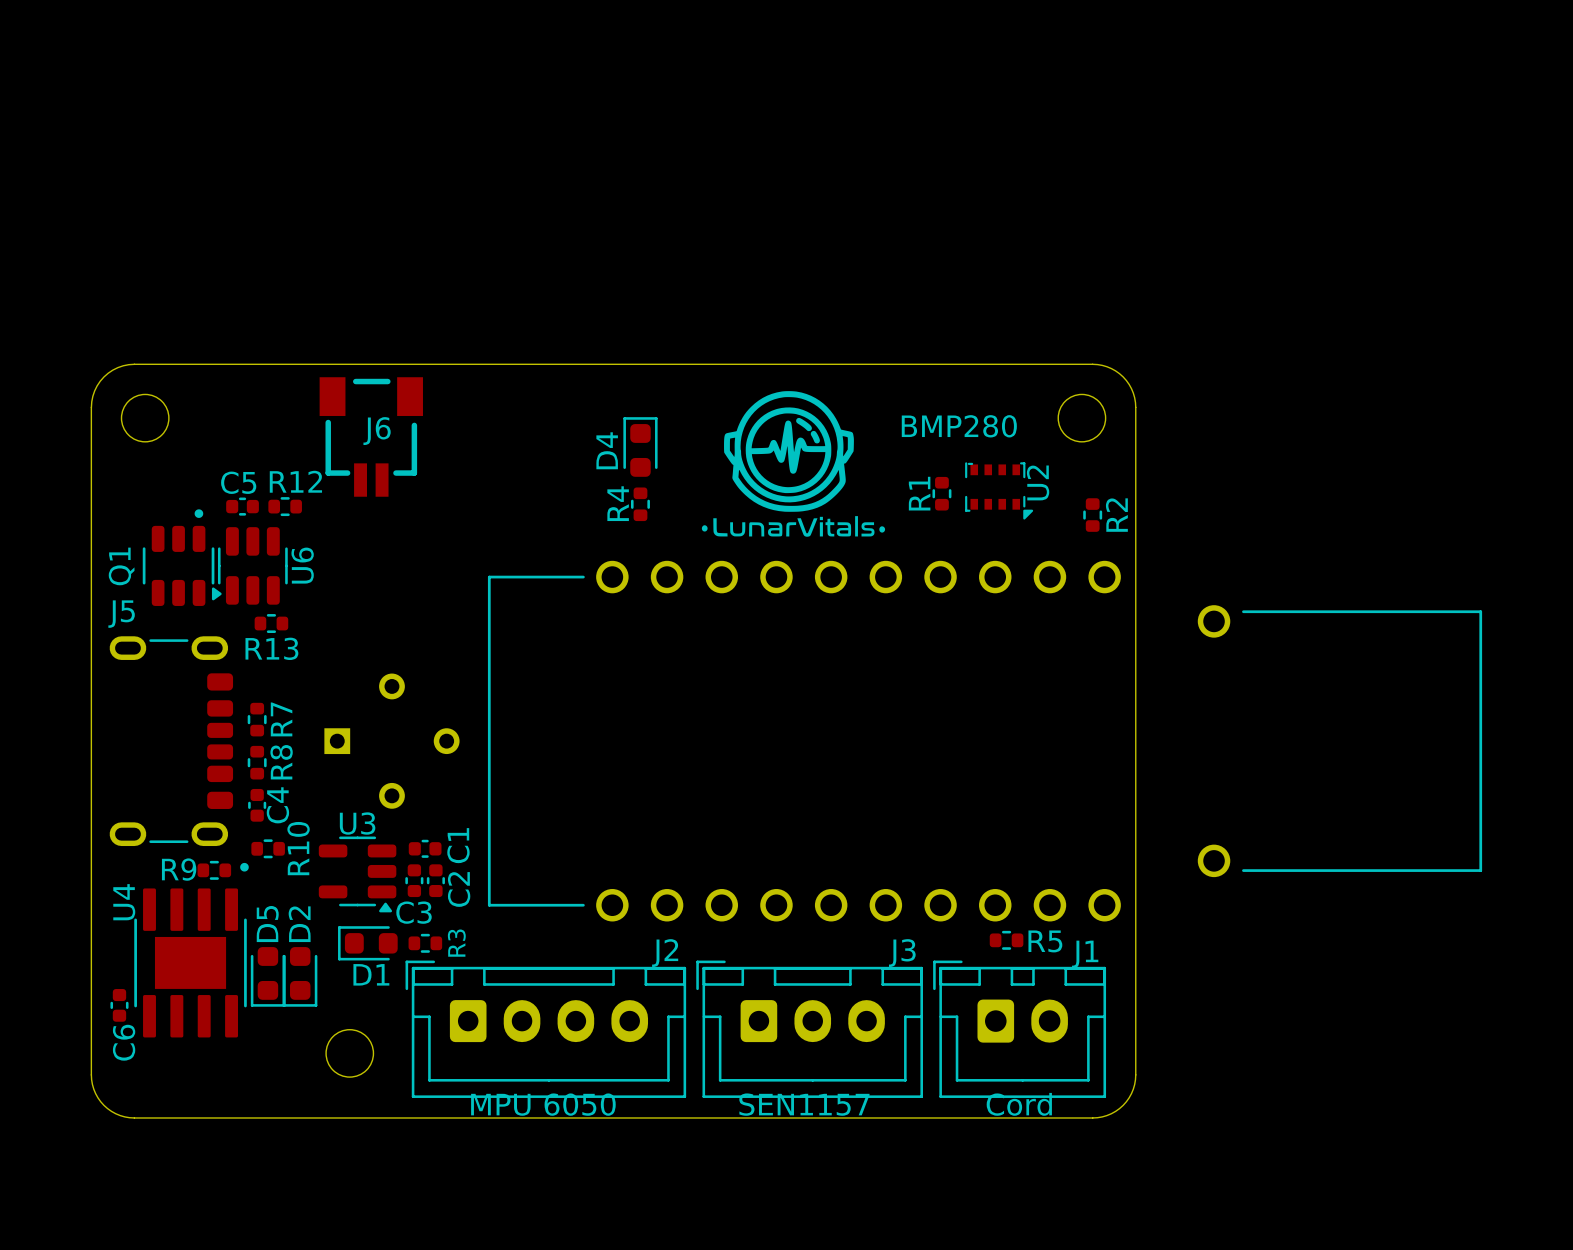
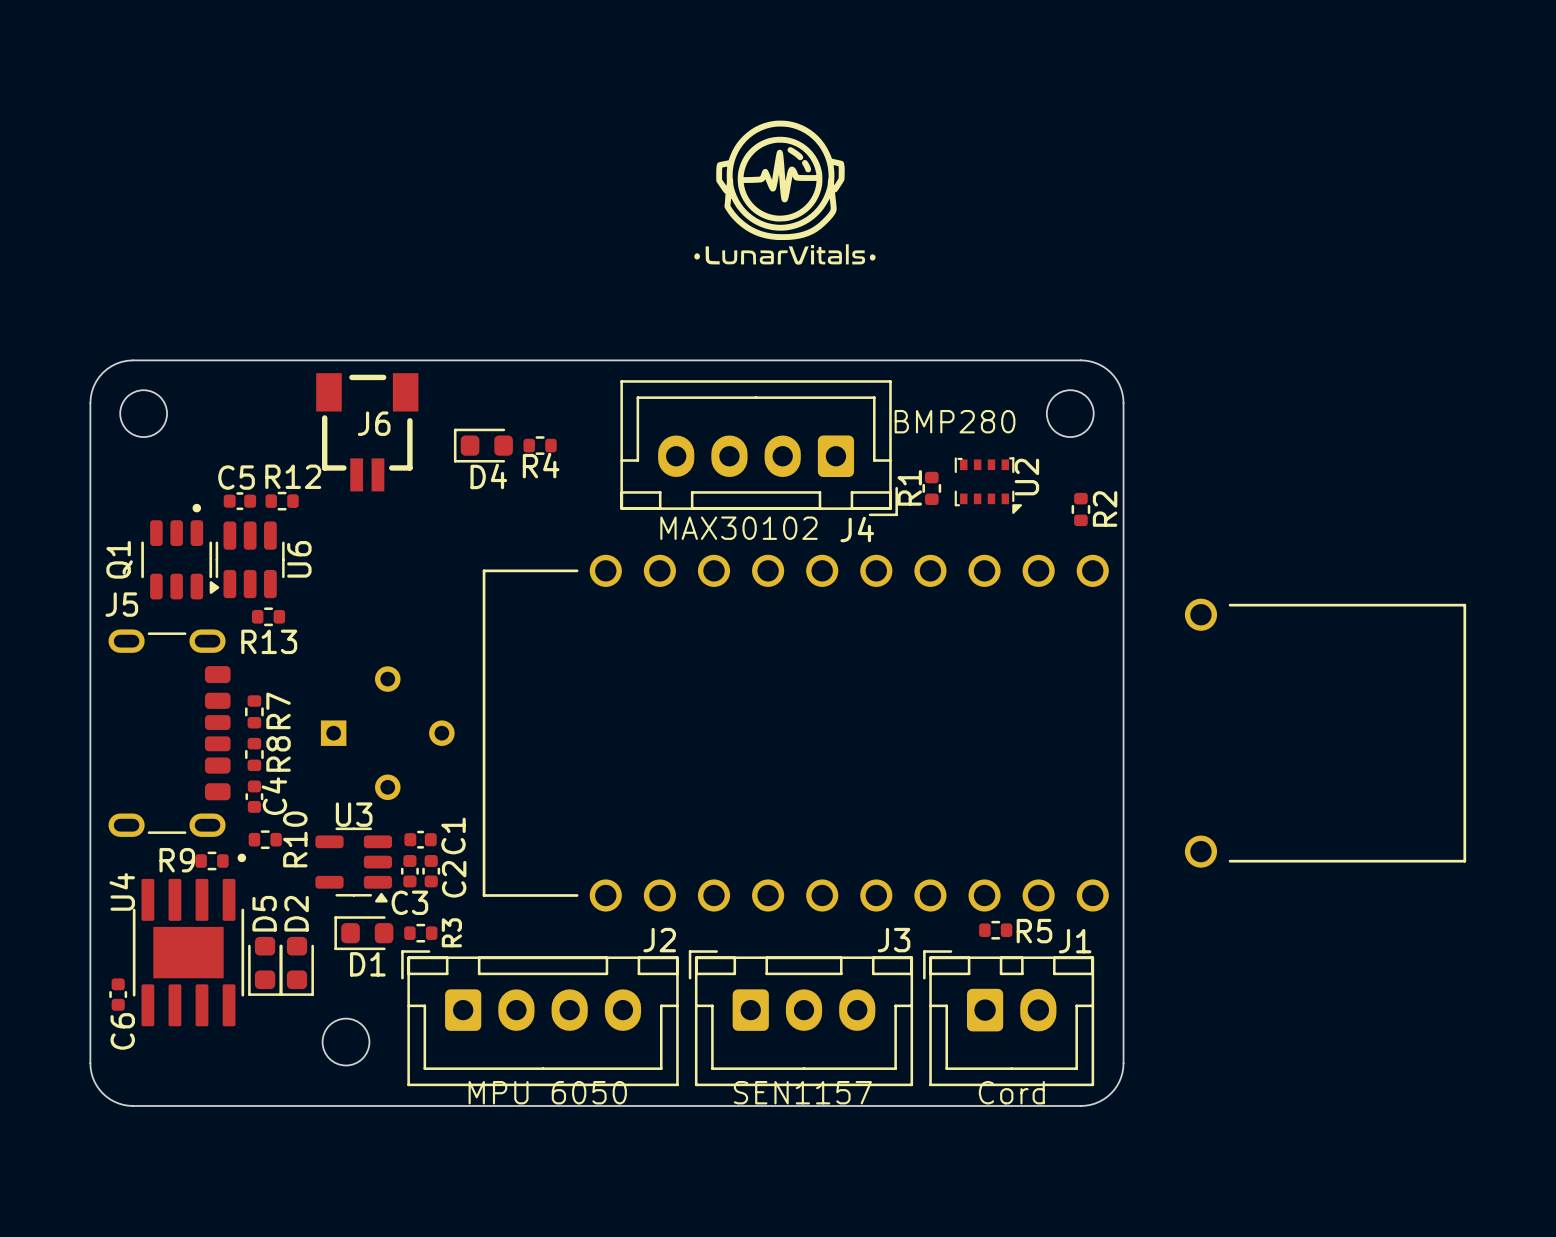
D4 rotation: 0° (640, 446) -> 90° counterclockwise (483, 445)
D4 position: (640, 446) -> (483, 445)
J4: none -> (759, 448)
drawing position: (793, 463) -> (784, 192)
R4 rotation: 0° (640, 504) -> 90° clockwise (540, 445)
R4 position: (640, 504) -> (540, 445)
text: none -> MAX30102 (738, 528)

